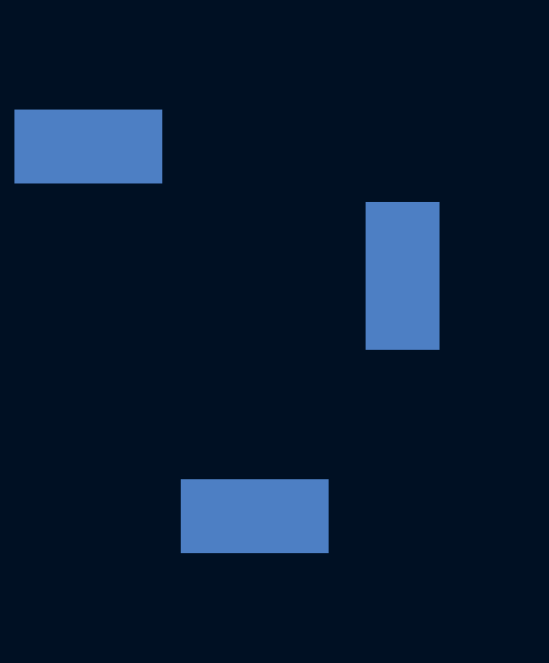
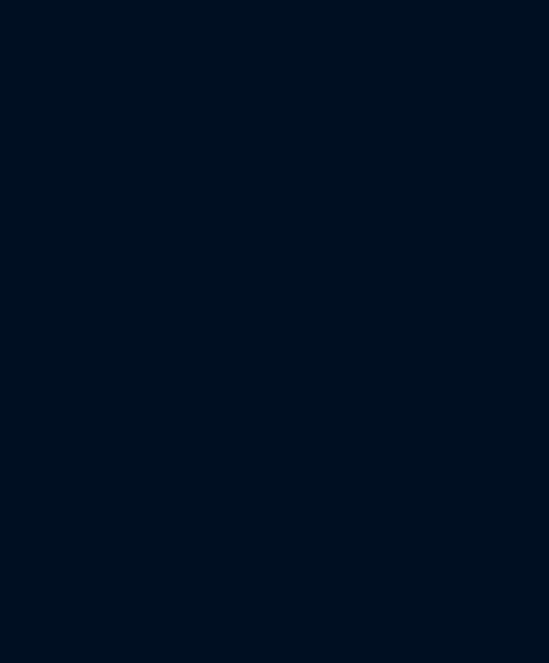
part: (88, 146) -> none
part: (402, 275) -> none
part: (254, 516) -> none

